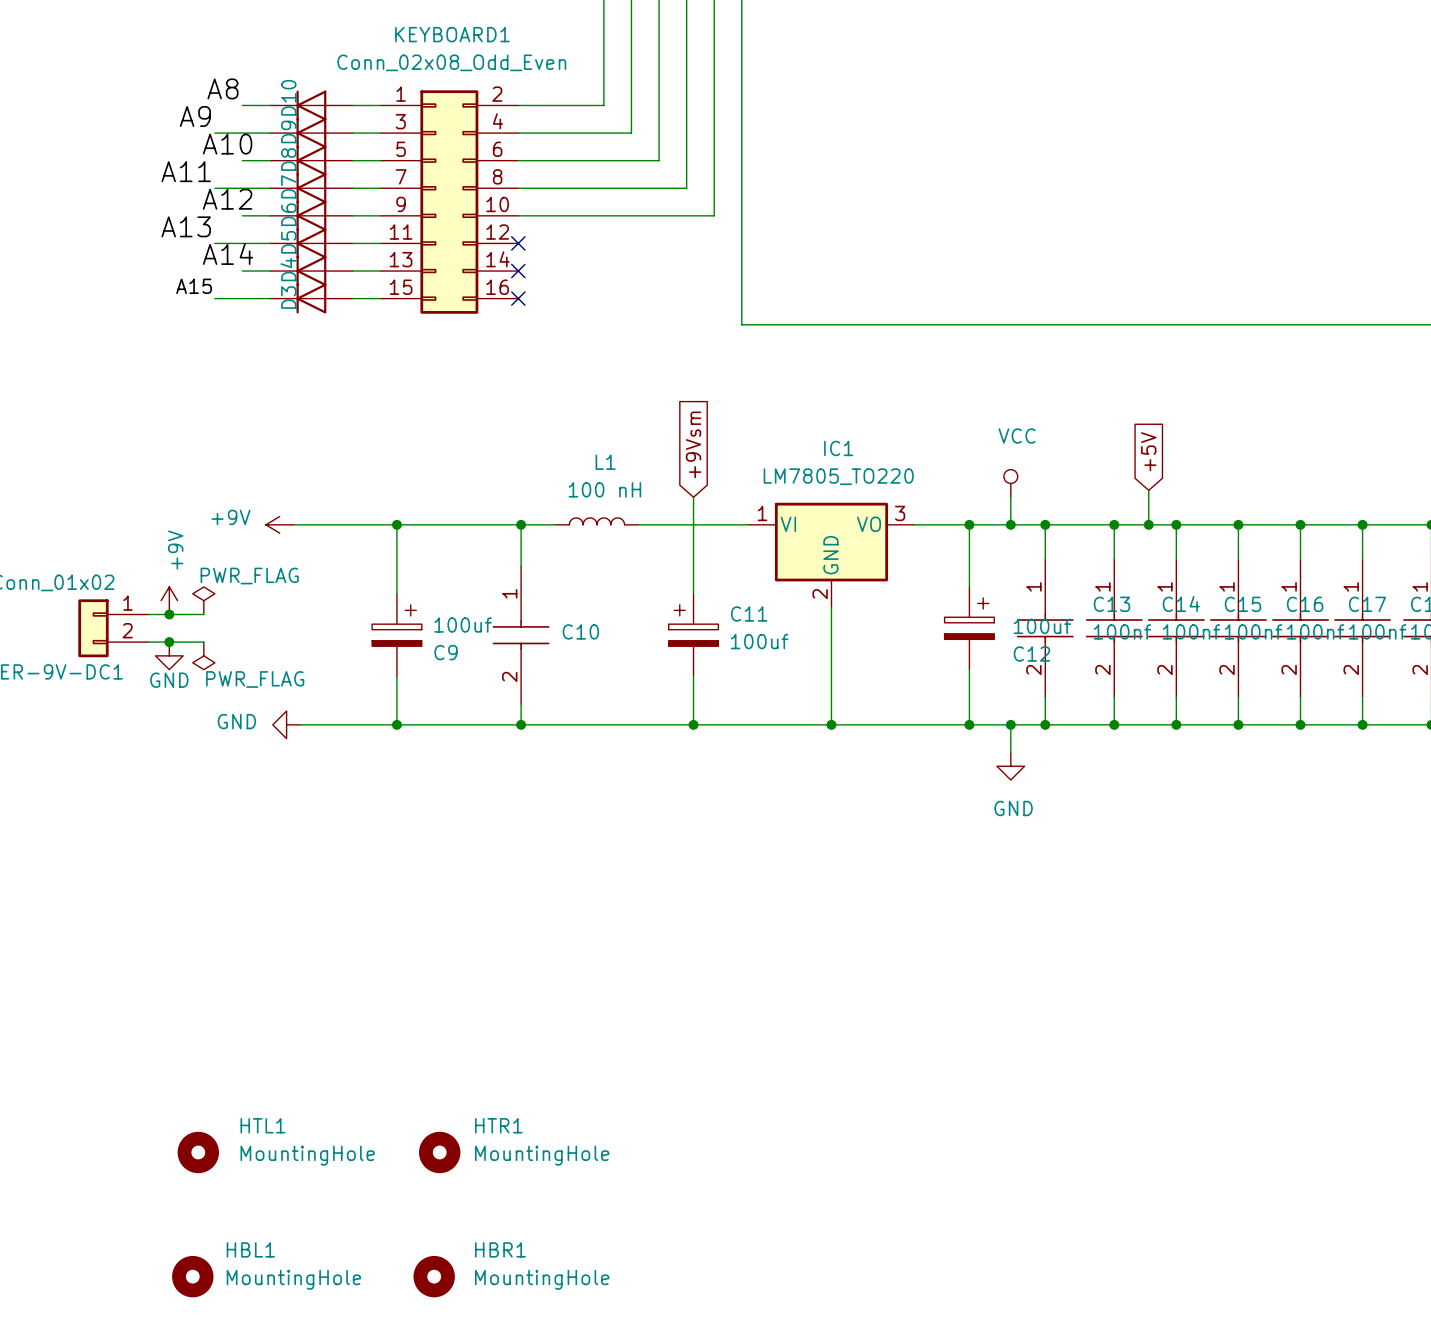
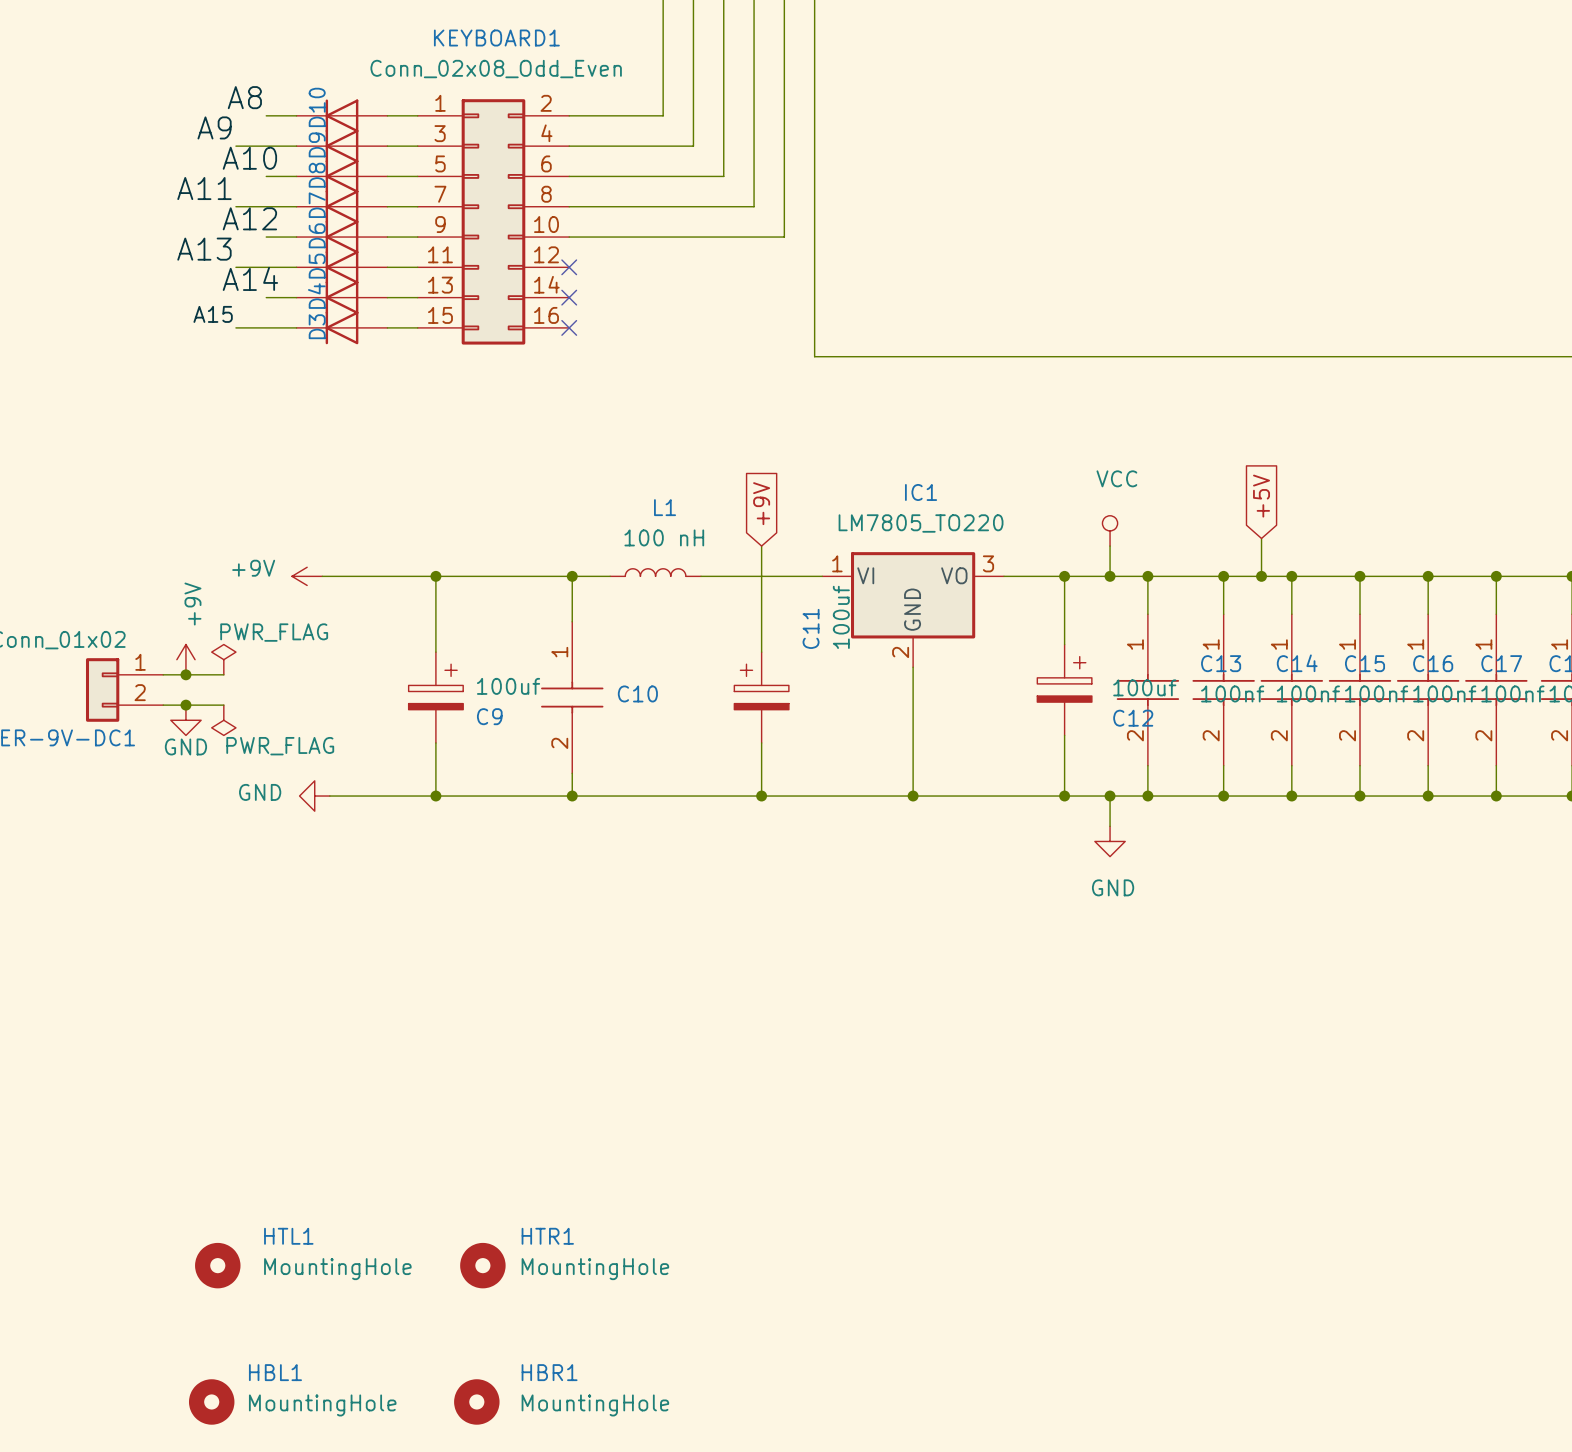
global label: +9Vsm (693, 444) -> +9V (761, 503)
C11 name rotation: 0° (749, 613) -> 90° counterclockwise (811, 628)
C11 value rotation: 0° (759, 641) -> 90° counterclockwise (841, 617)
C11 value position: 100uf (759, 641) -> 100uf (841, 617)

